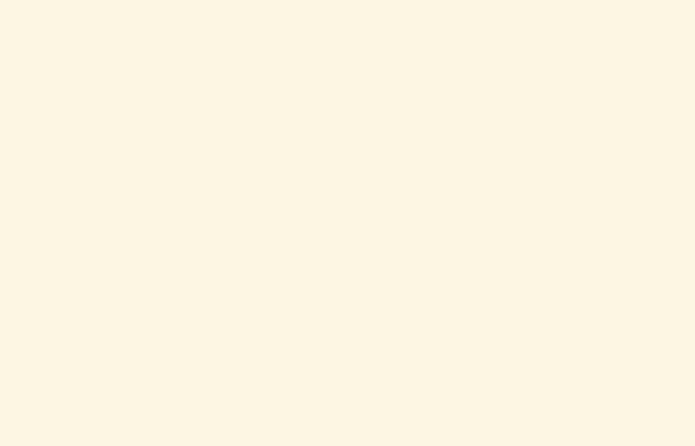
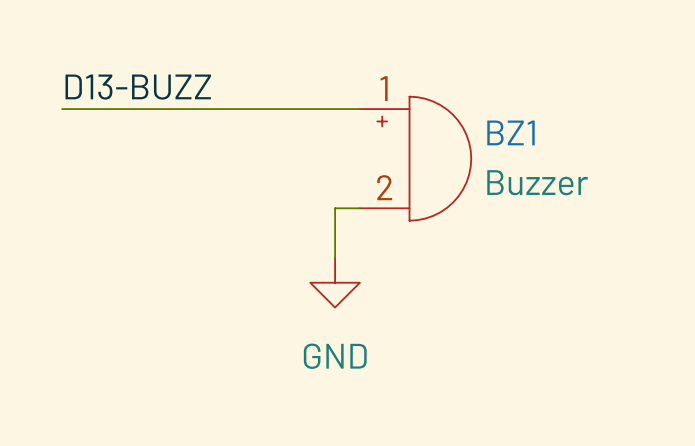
label: none -> D13-BUZZ (138, 87)
wire: none -> (62, 109) (359, 109)
BZ1: none -> Buzzer (415, 158)
wire: none -> (359, 208) (335, 208) (335, 257)
power symbol: none -> GND (335, 282)

